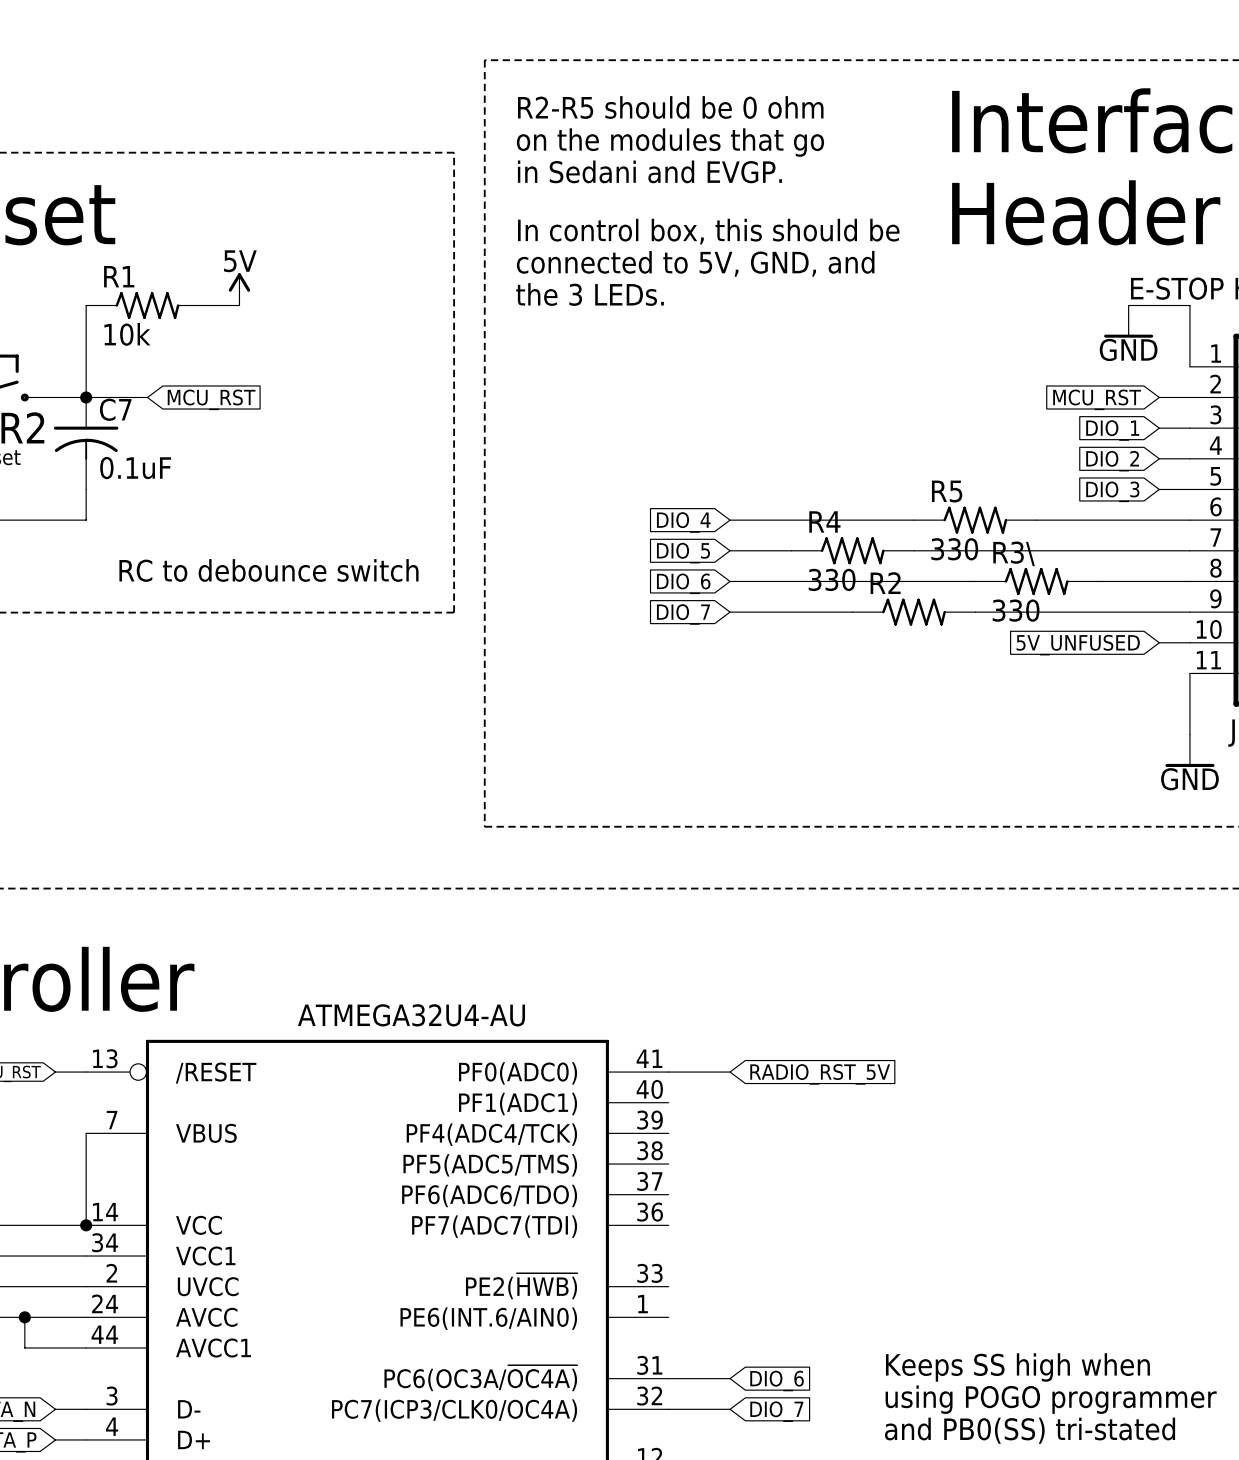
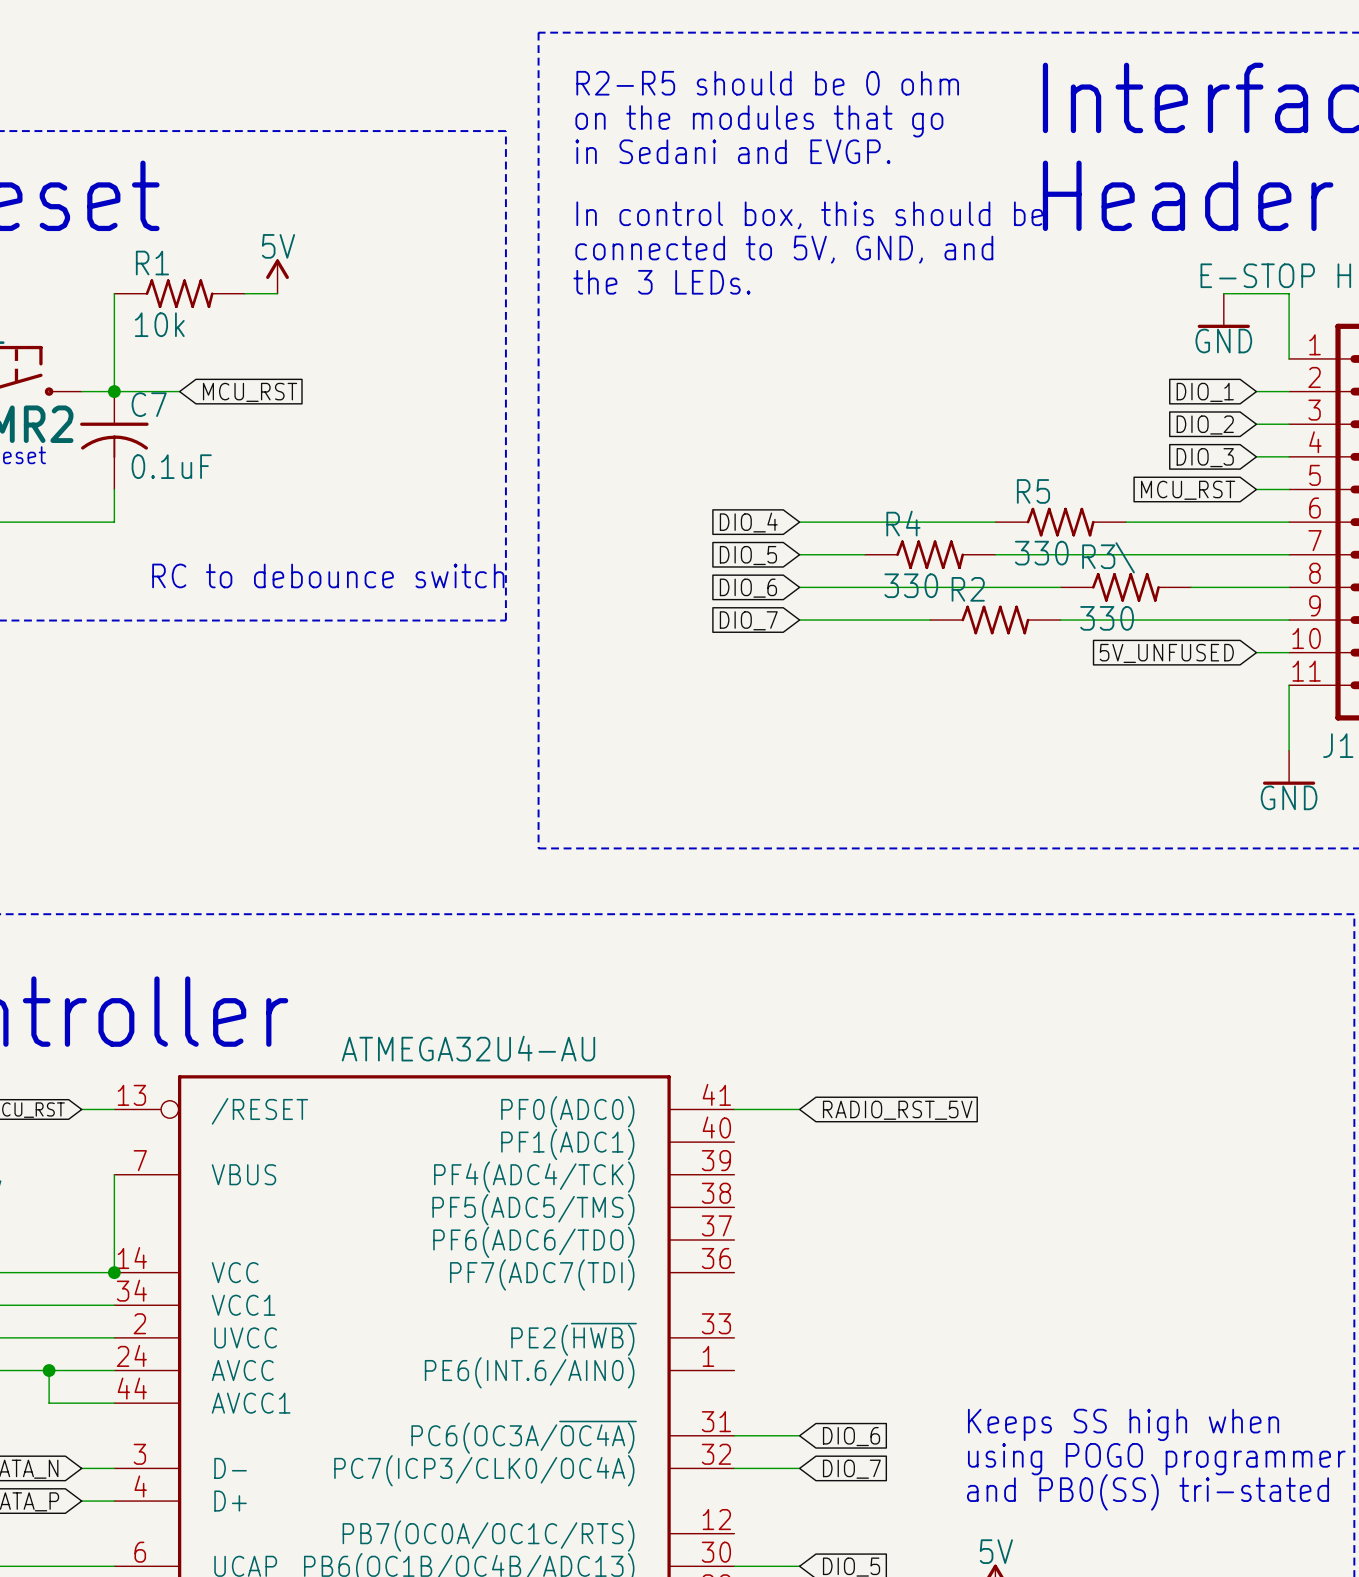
global label: MCU_RST (1097, 399) -> DIO_1 (1205, 392)
global label: DIO_1 (1112, 430) -> DIO_2 (1205, 425)
global label: DIO_2 (1112, 461) -> DIO_3 (1205, 457)
global label: DIO_3 (1112, 491) -> MCU_RST (1188, 490)

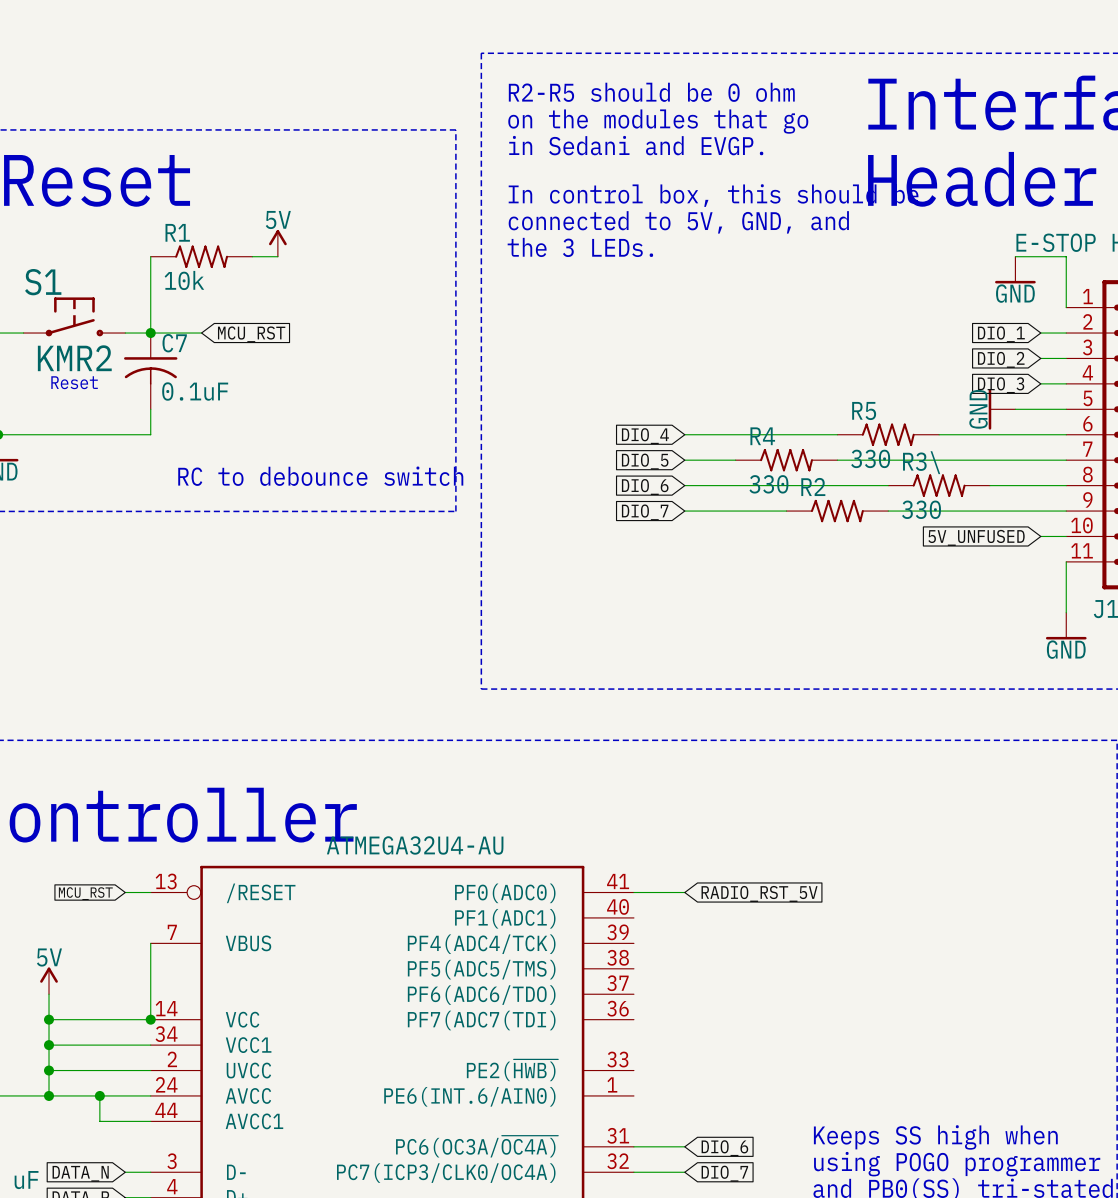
power symbol: none -> GND (1002, 409)
wire: none -> (1015, 409) (1040, 409)
global label: MCU_RST (1188, 490) -> none

